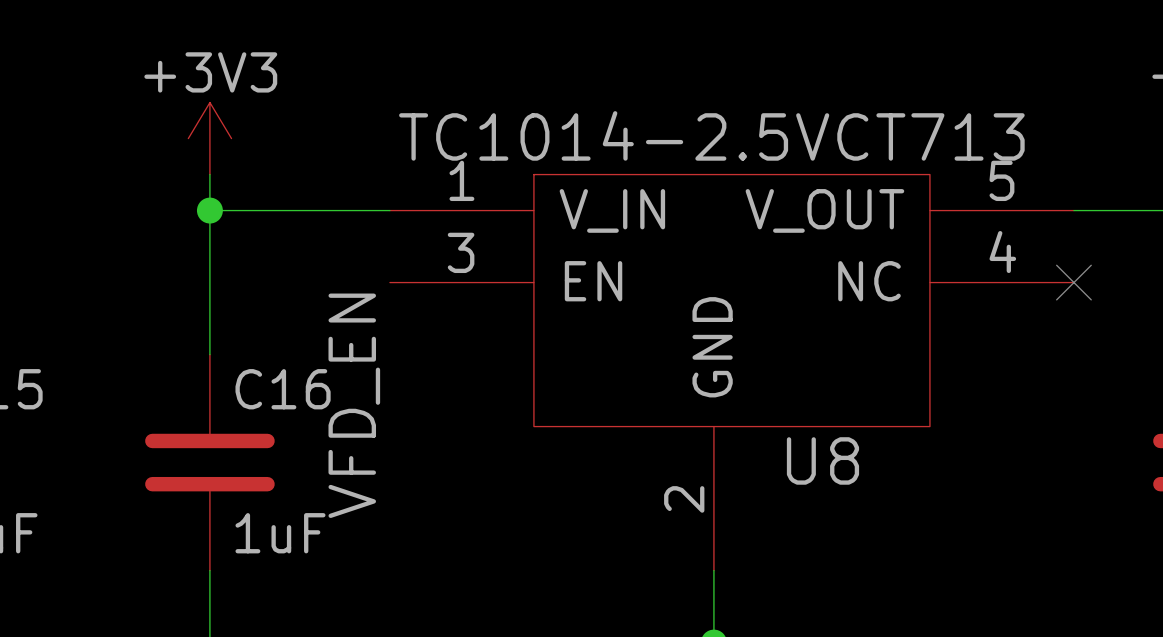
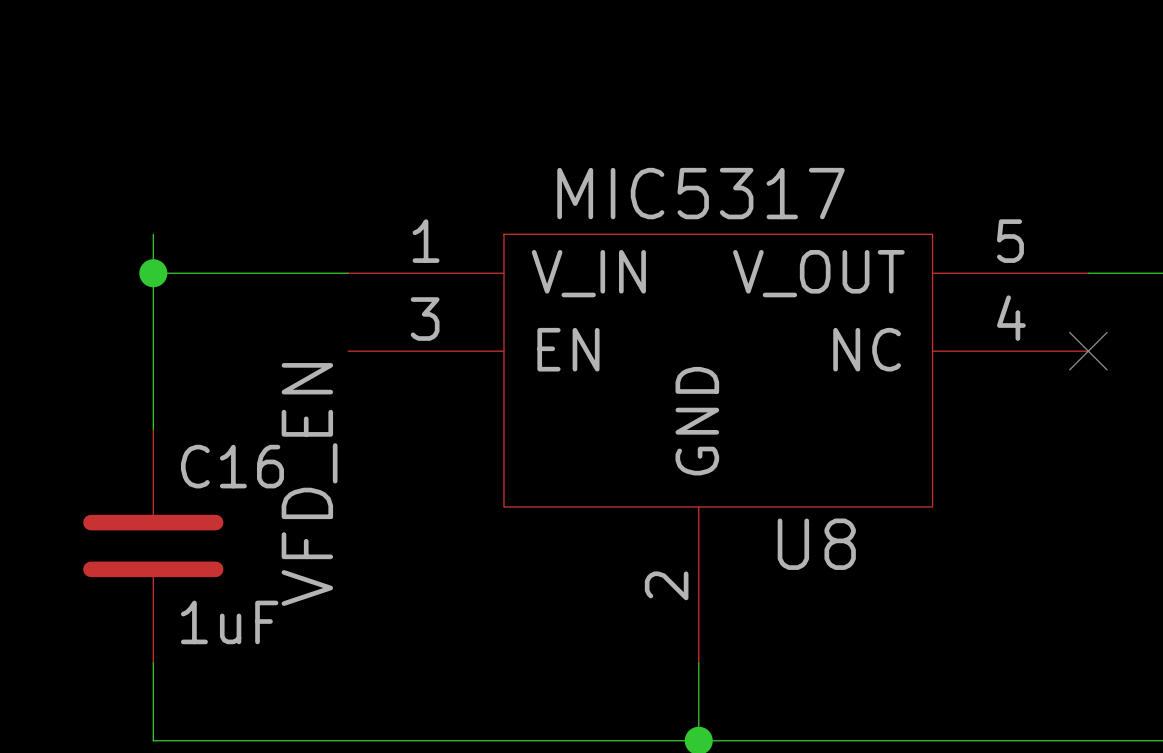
U8 value: TC1014-2.5VCT713 (711, 135) -> MIC5317 (701, 193)
power symbol: +3V3 (209, 138) -> none

